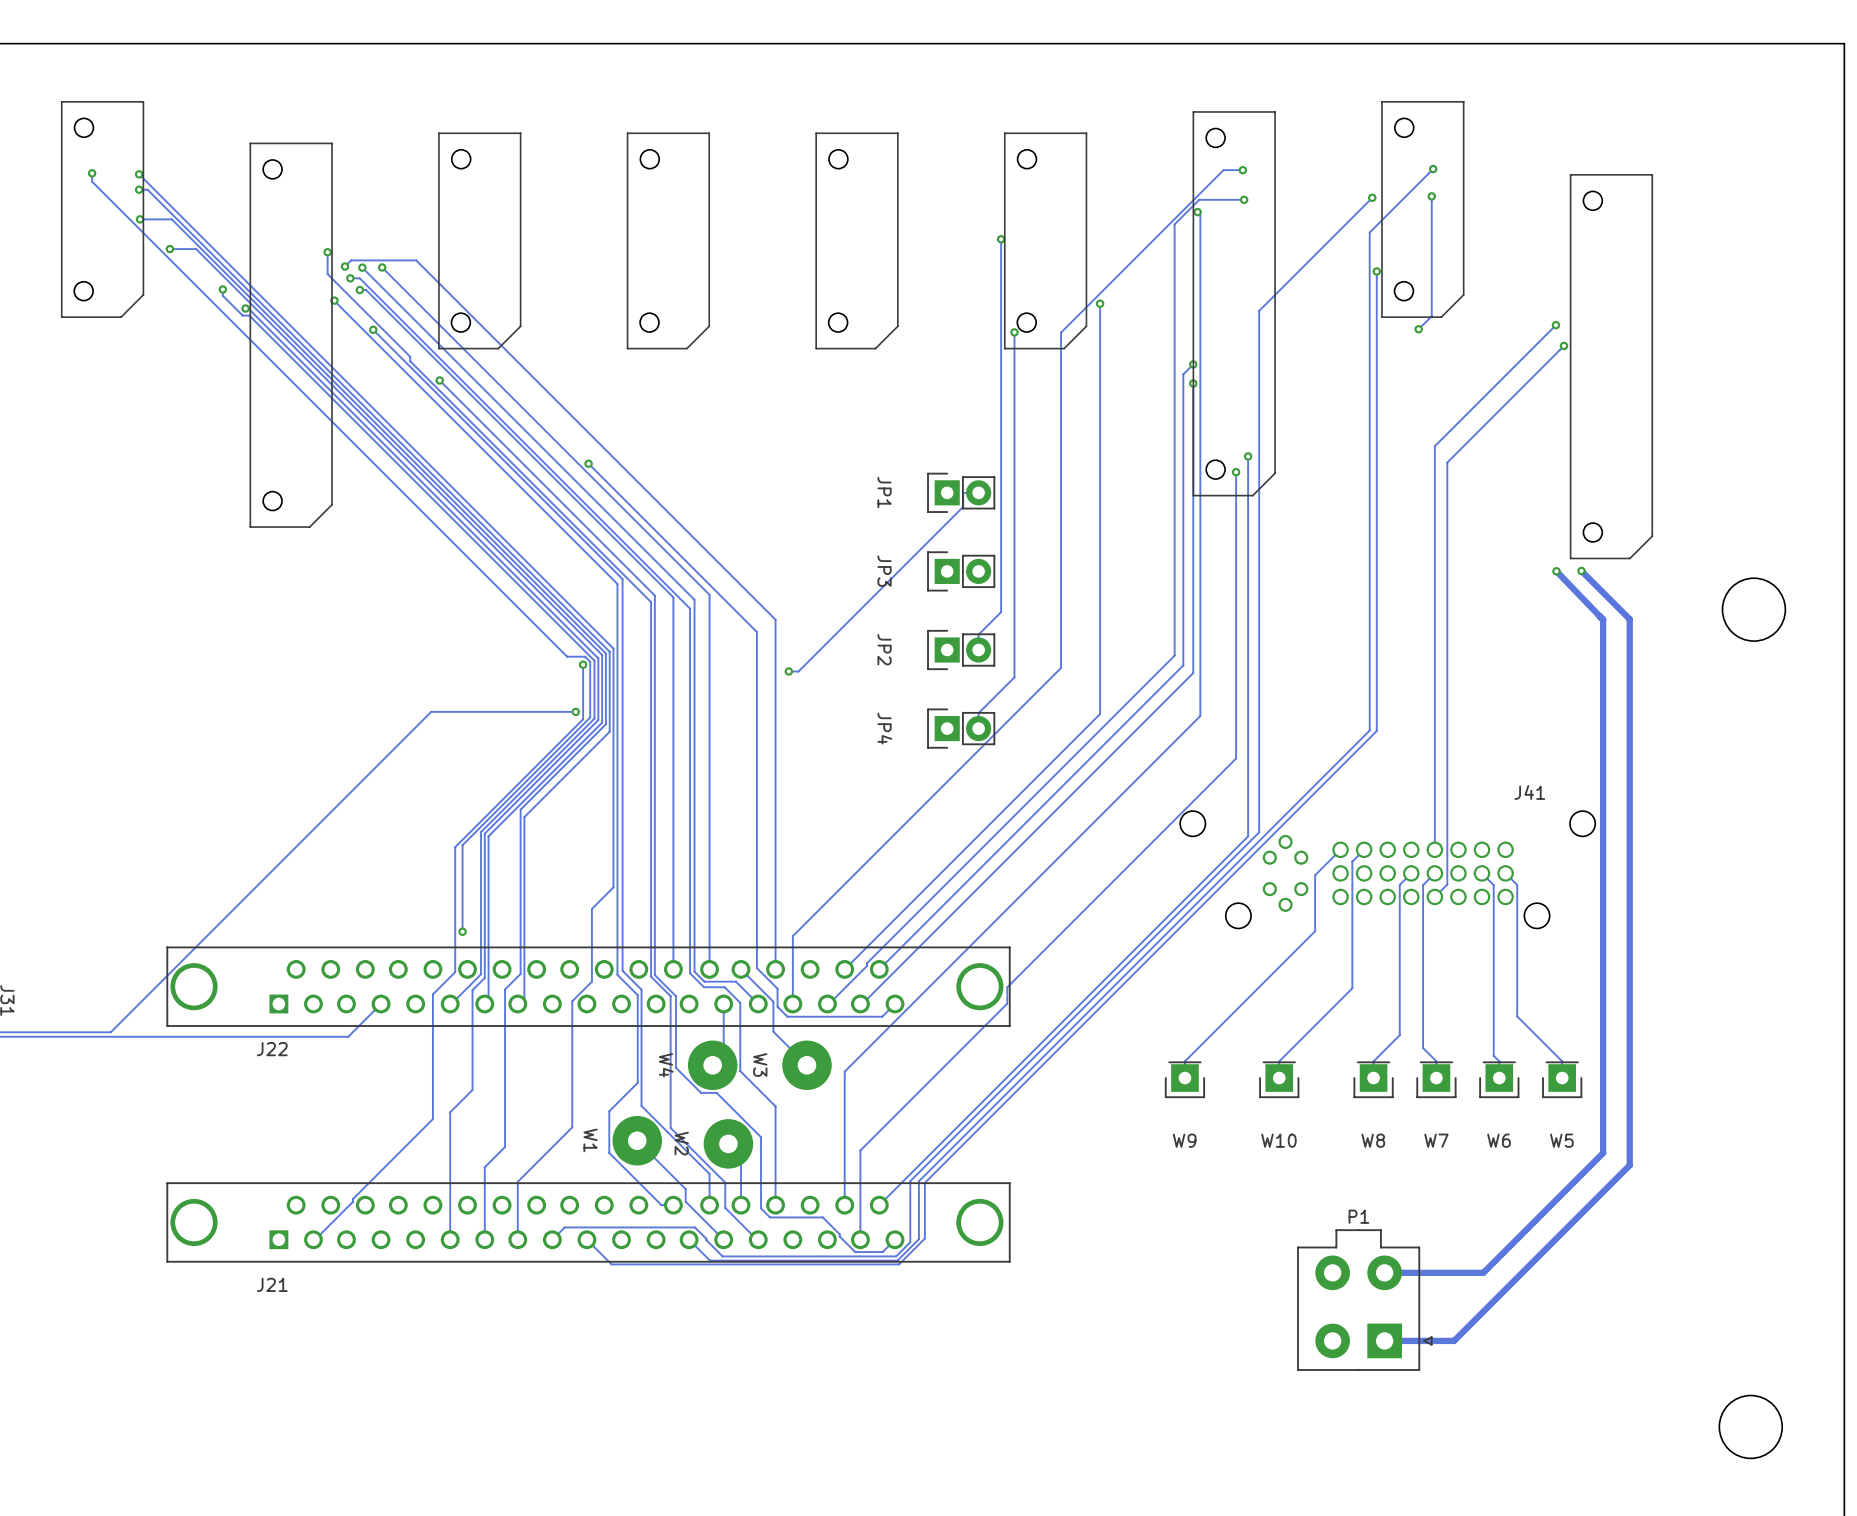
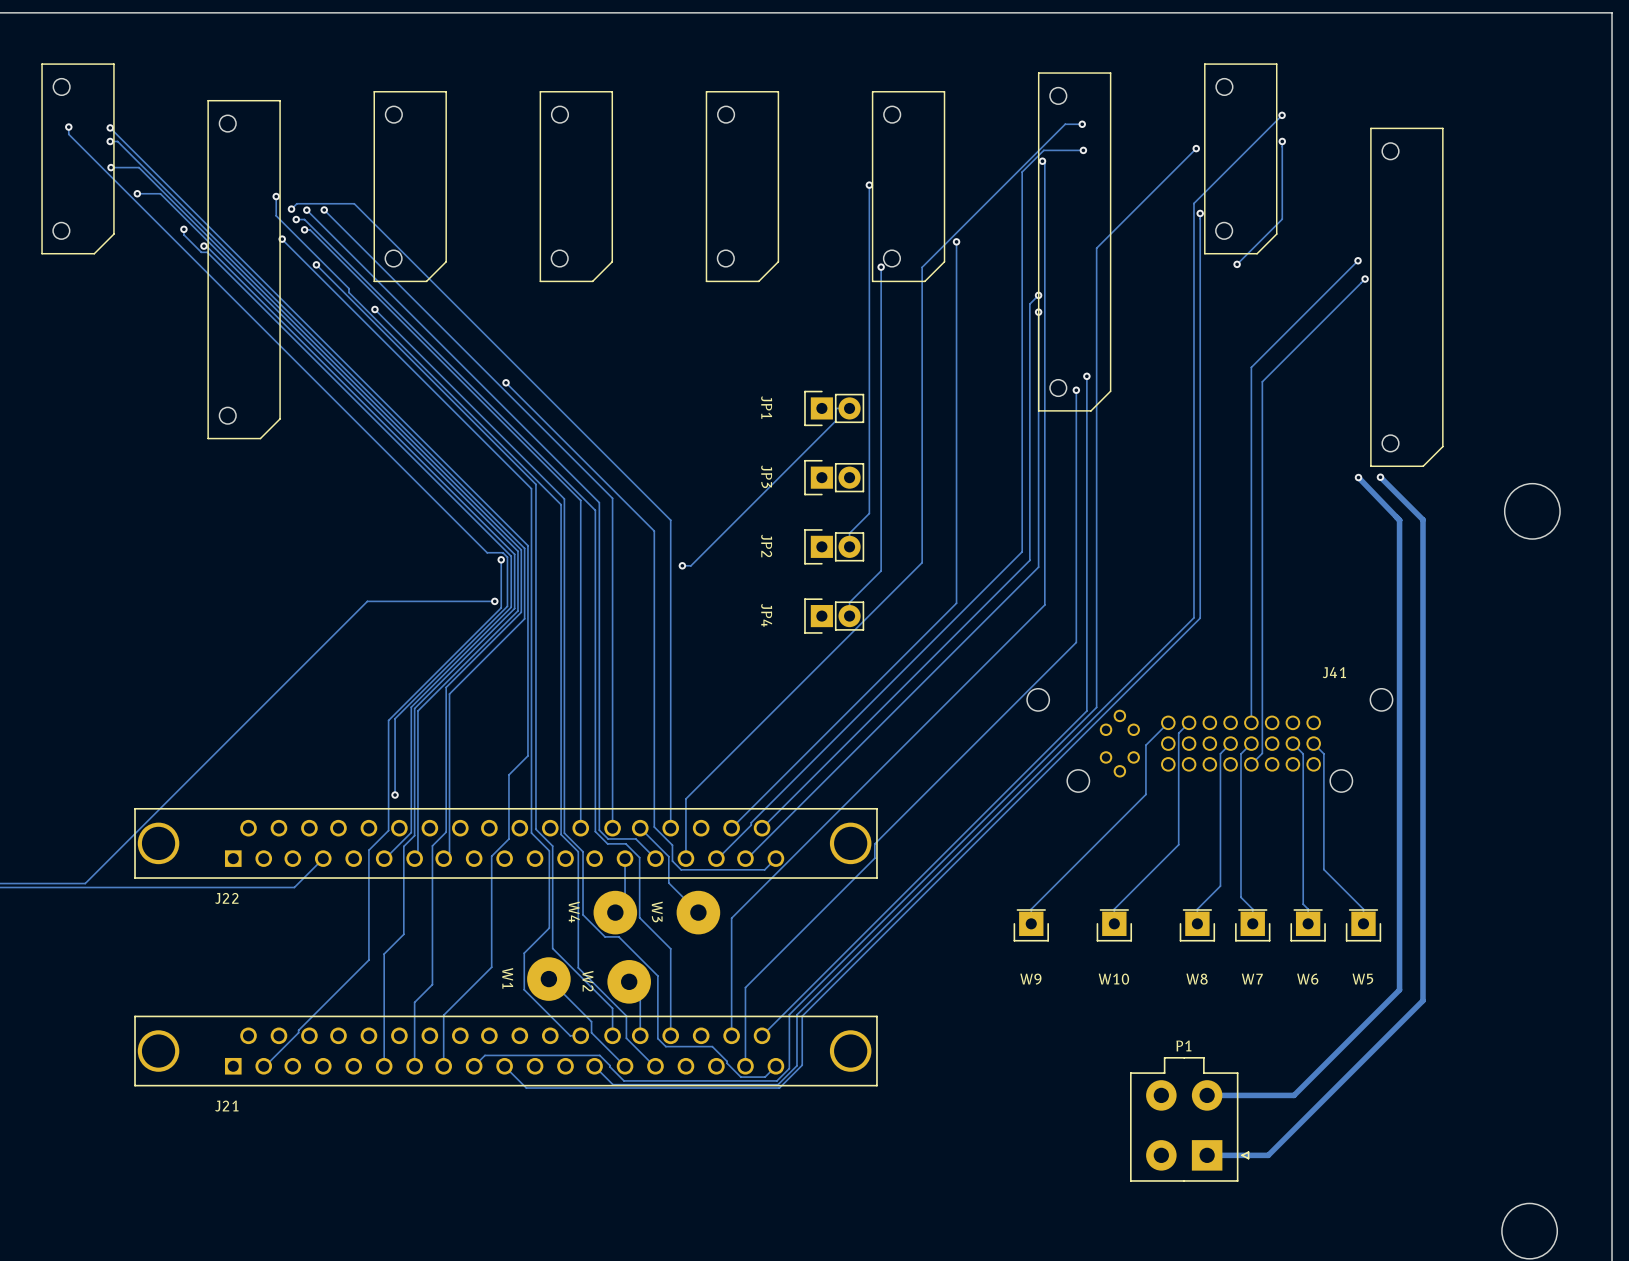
via: none -> (1282, 115)
track: (1433, 169) (1369, 232) (1369, 260) -> (1282, 115) (1193, 203)
via: (1433, 169) -> none
via: none -> (1282, 141)
track: (1431, 196) (1431, 316) -> (1282, 141) (1282, 219) (1248, 252)
via: (1431, 196) -> none

